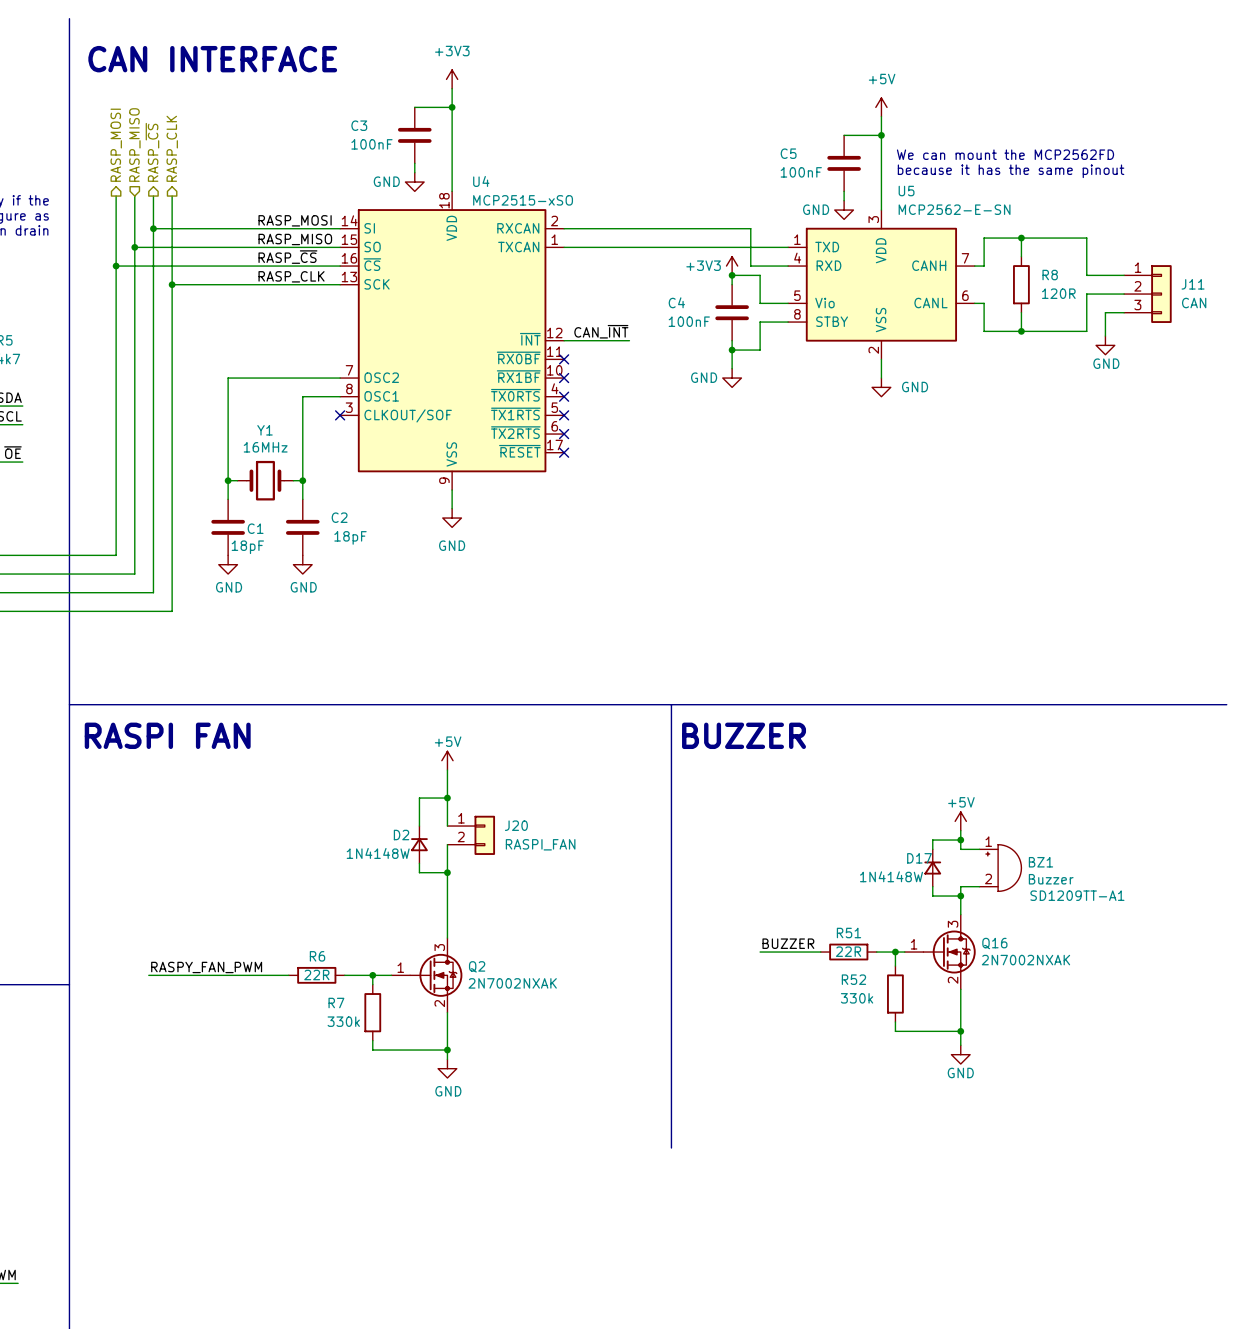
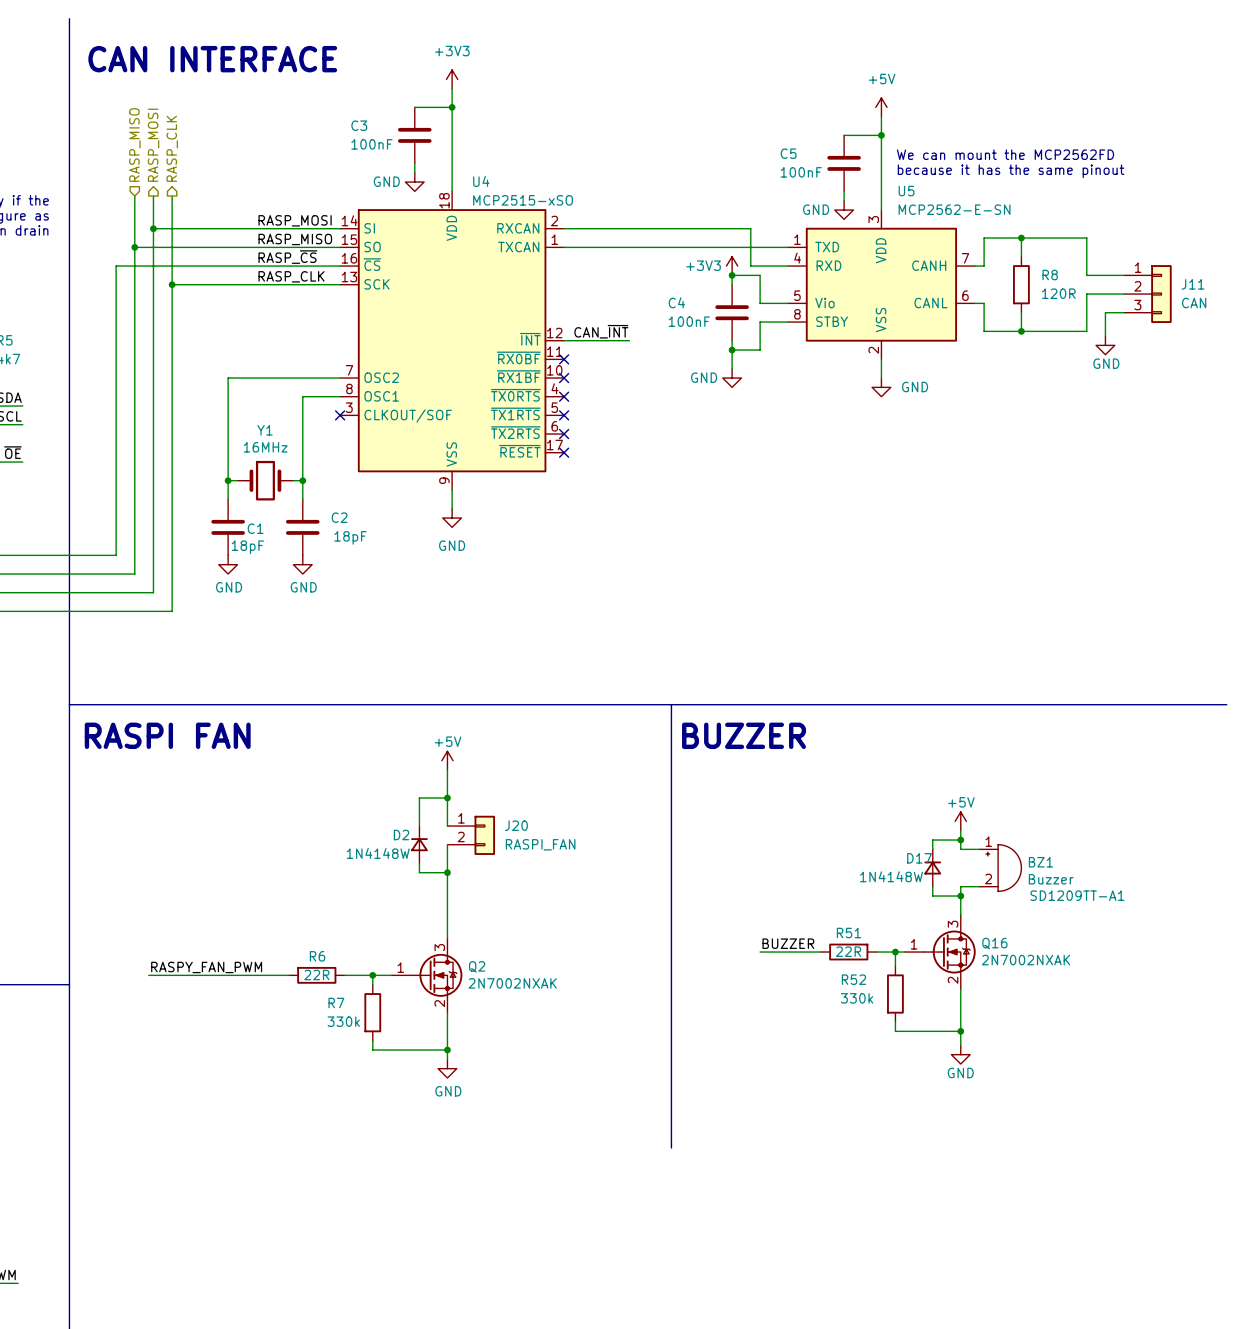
hierarchical label: RASP_MOSI (116, 145) -> none
hierarchical label: RASP_~{CS} (152, 152) -> RASP_MOSI (153, 145)
wire: (116, 196) (116, 266) -> none
junction: (116, 266) -> none

